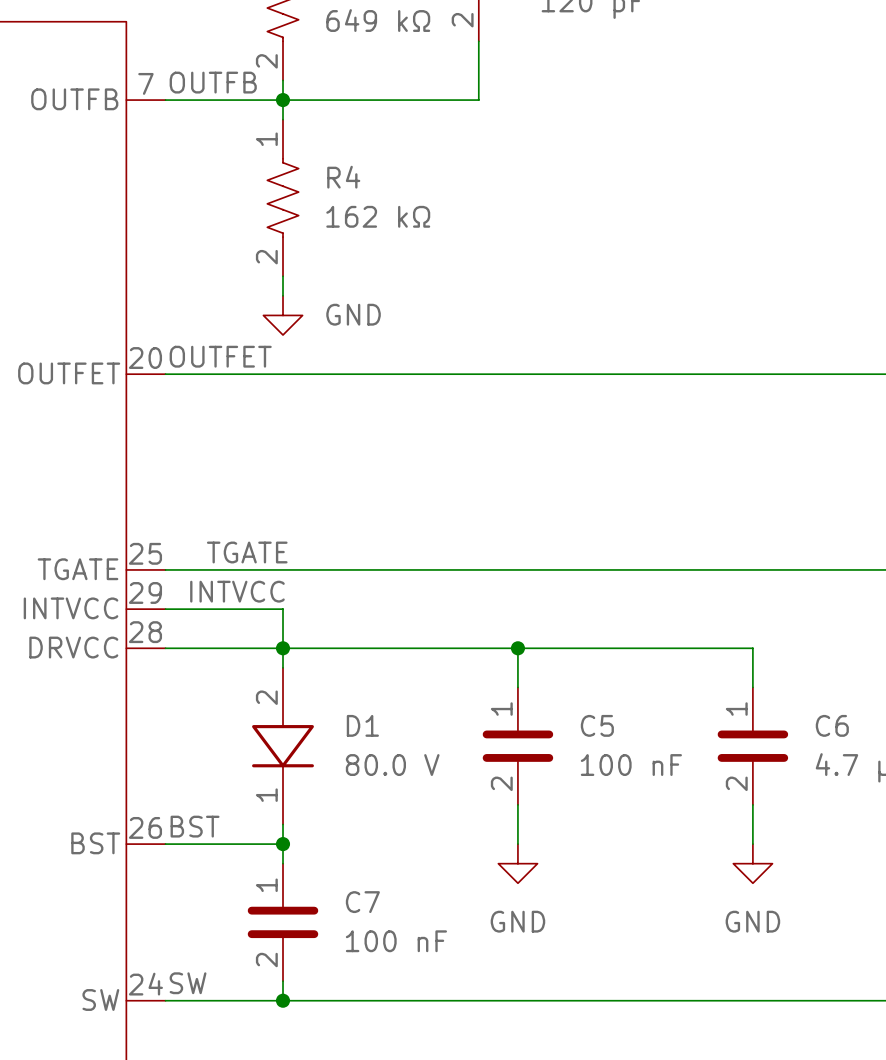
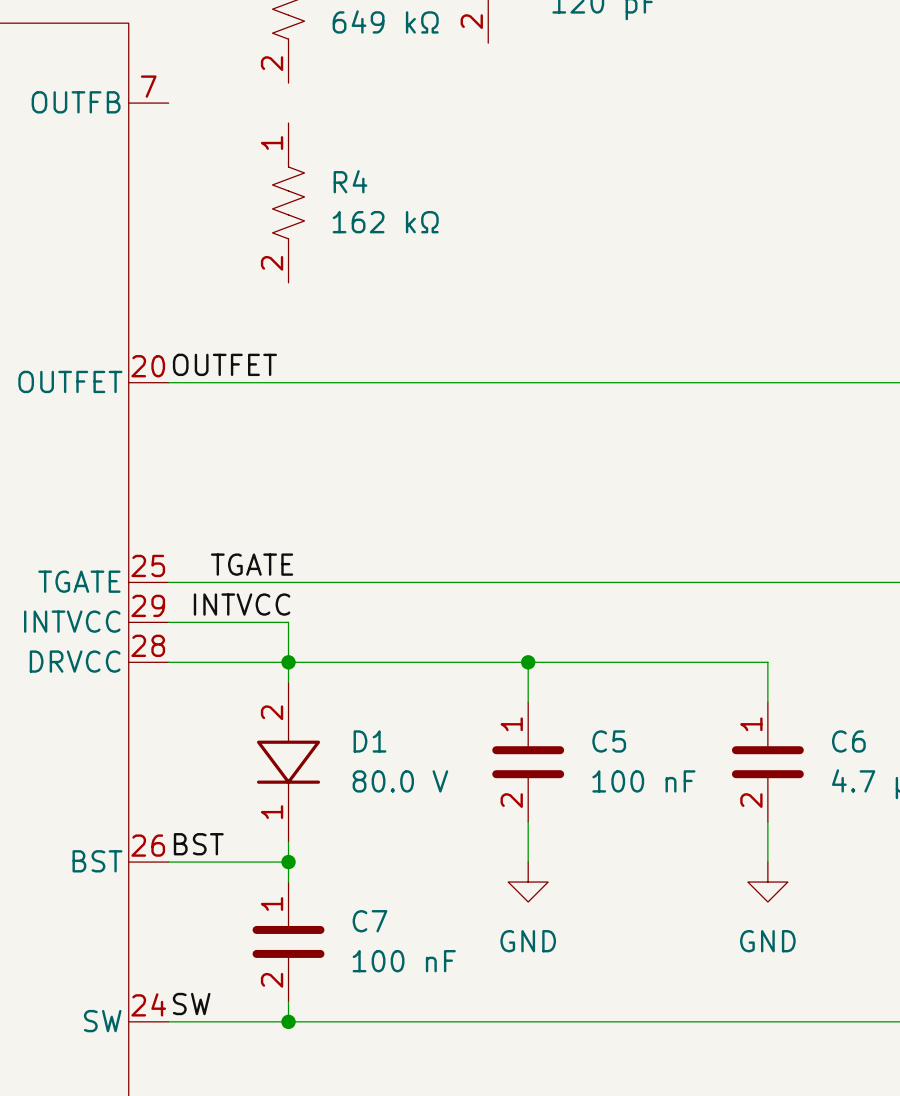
wire: (478, 41) (478, 100) (165, 100) -> none
wire: (283, 80) (283, 119) -> none
label: OUTFB (213, 82) -> none
junction: (283, 100) -> none
wire: (283, 276) (283, 295) -> none
power symbol: GND (283, 315) -> none

